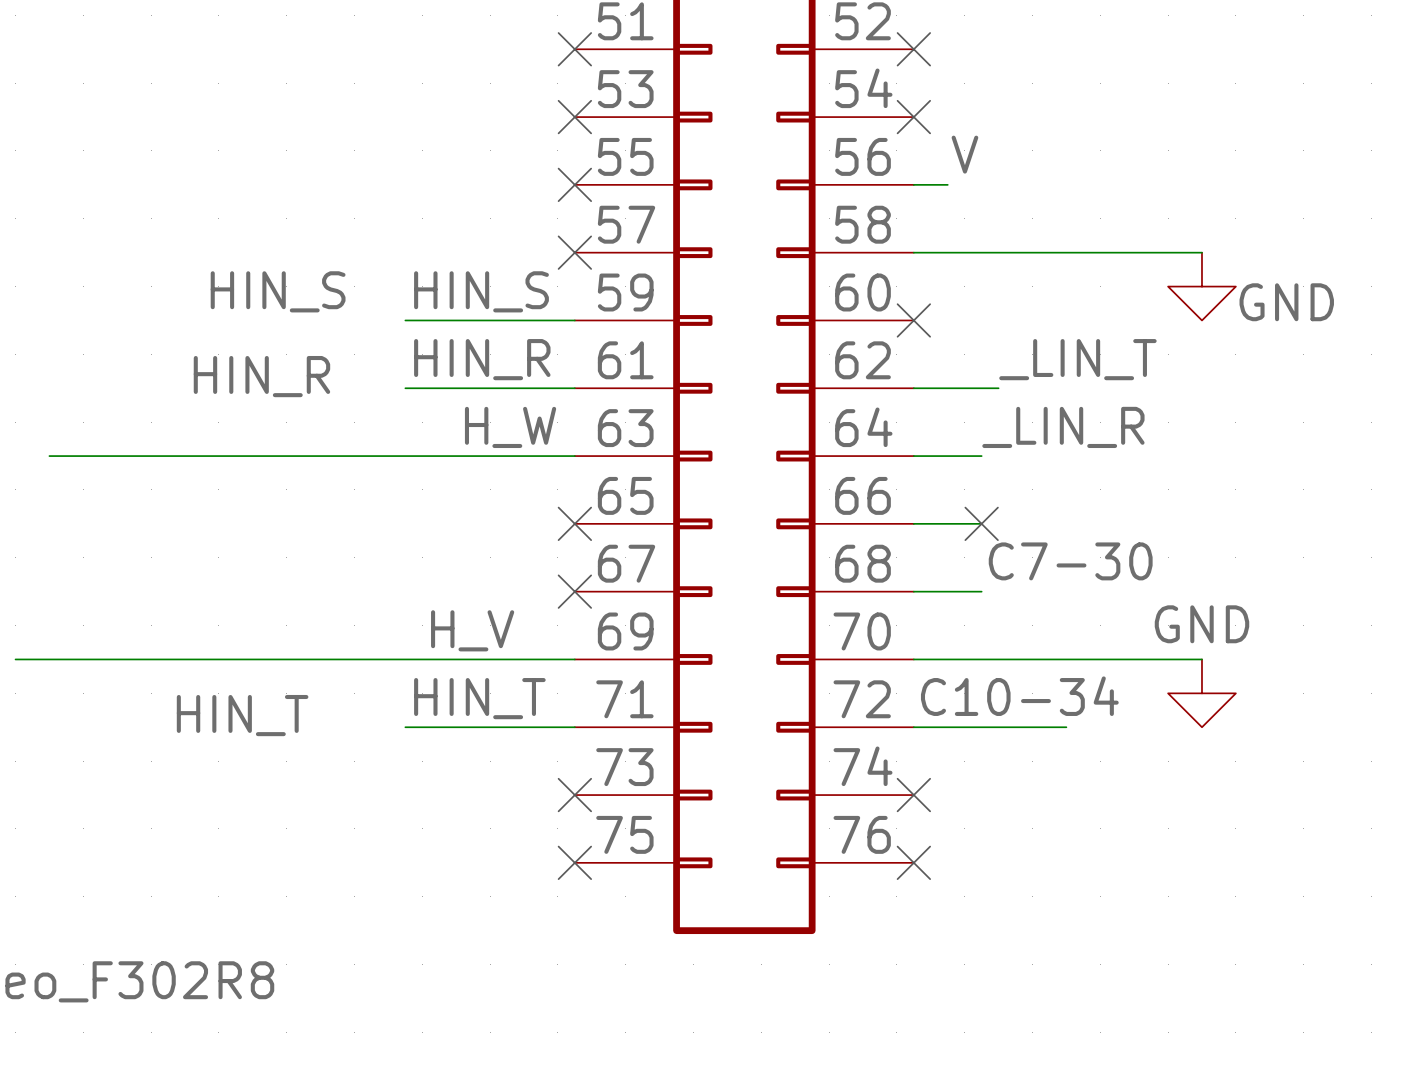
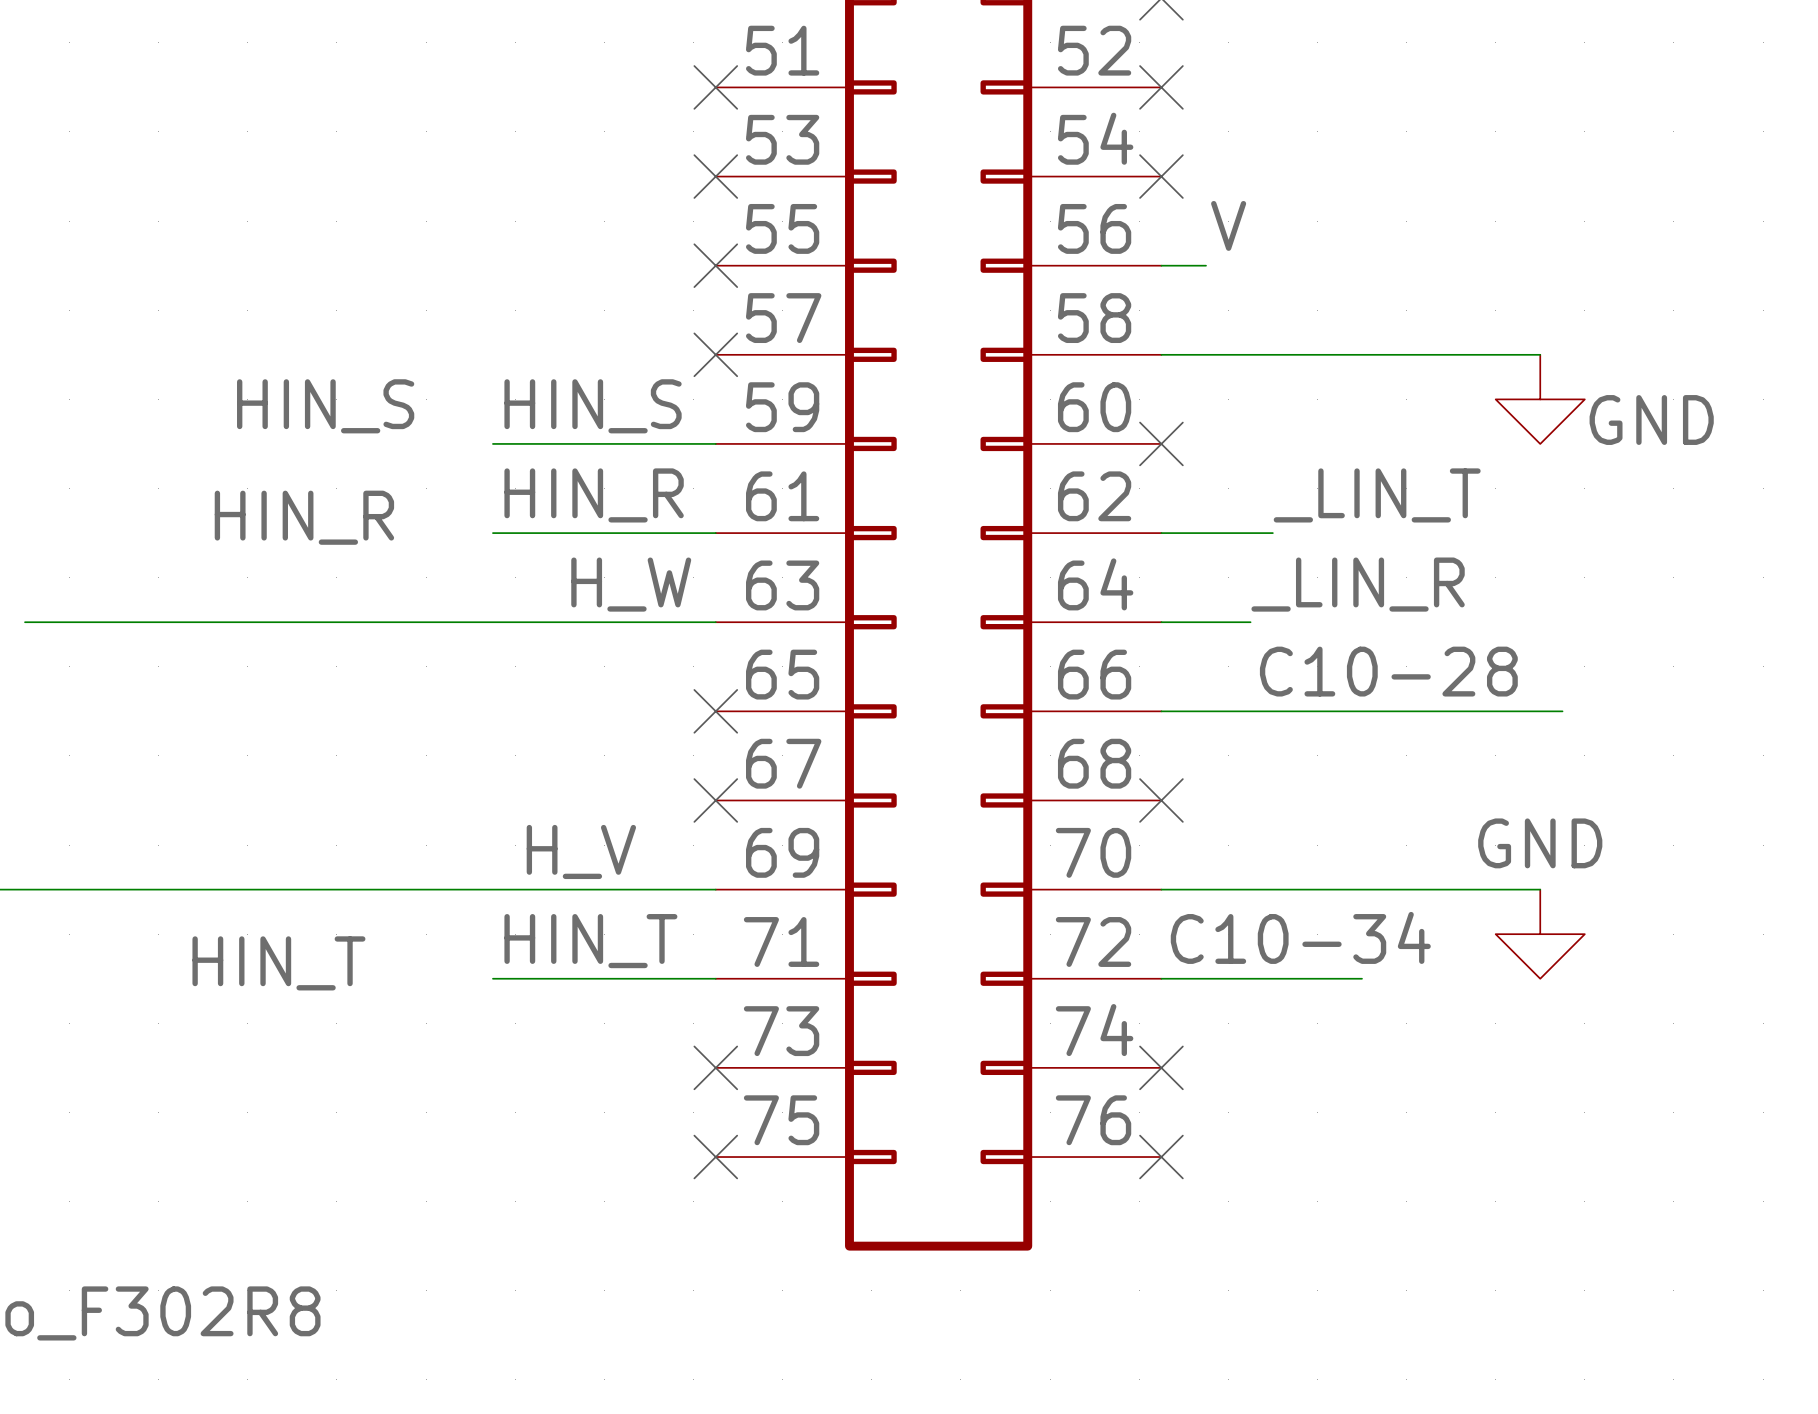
label: none -> C10-28 (1388, 671)
wire: none -> (1250, 711) (1562, 711)
no-connect mark position: (981, 523) -> (1161, 800)
label: C7-30 (1070, 561) -> none
wire: (913, 591) (981, 591) -> none

